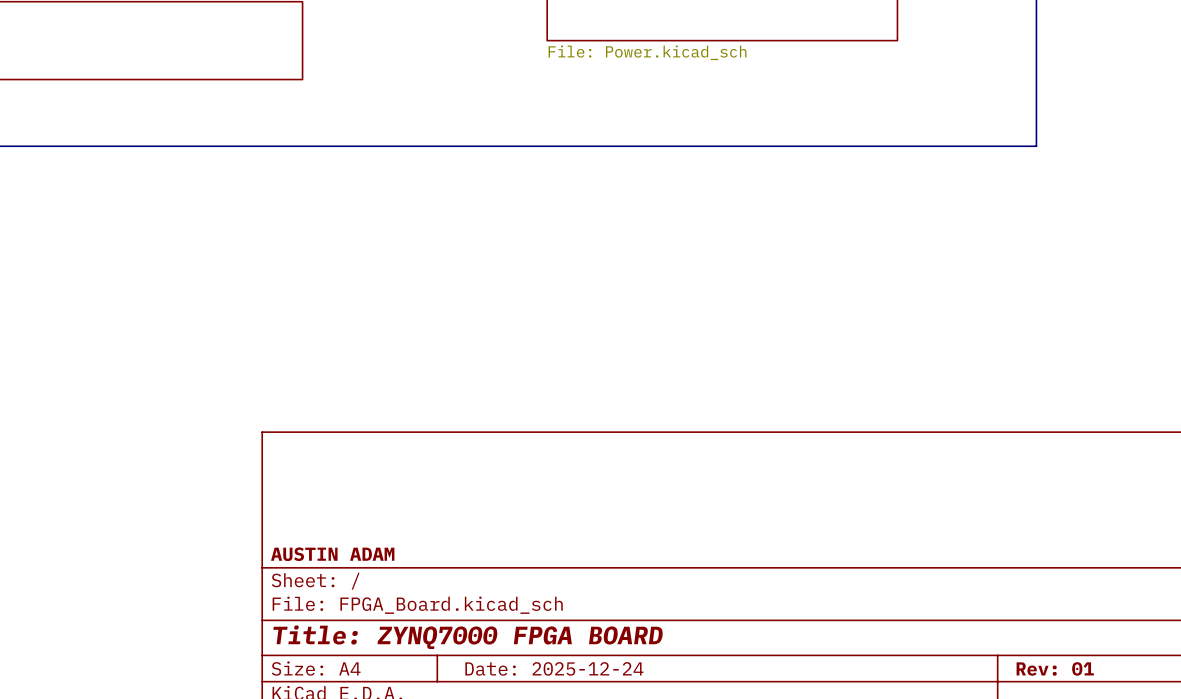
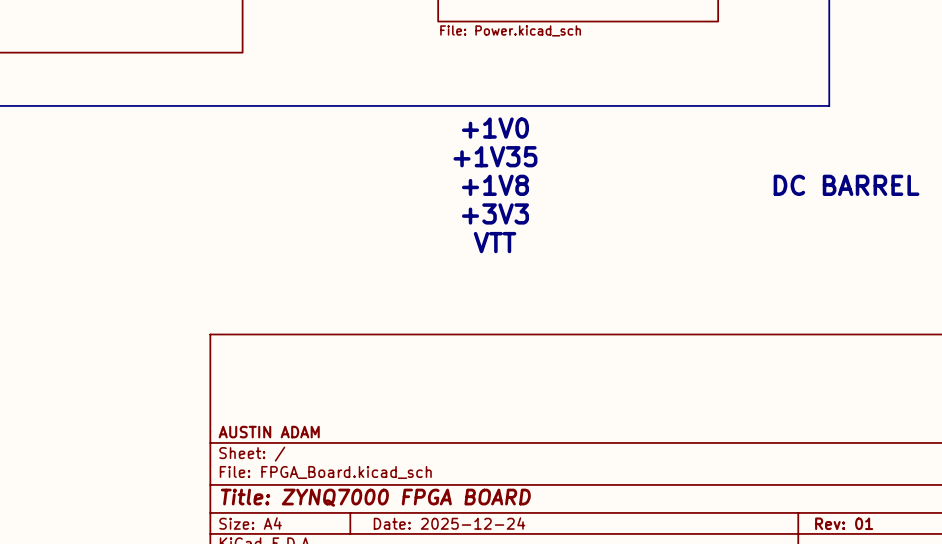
text: none -> +1V0 (495, 128)
text: none -> +1V35 (495, 156)
text: none -> +1V8 (495, 185)
text: none -> DC BARREL (846, 185)
text: none -> +3V3 (495, 213)
text: none -> VTT (495, 242)

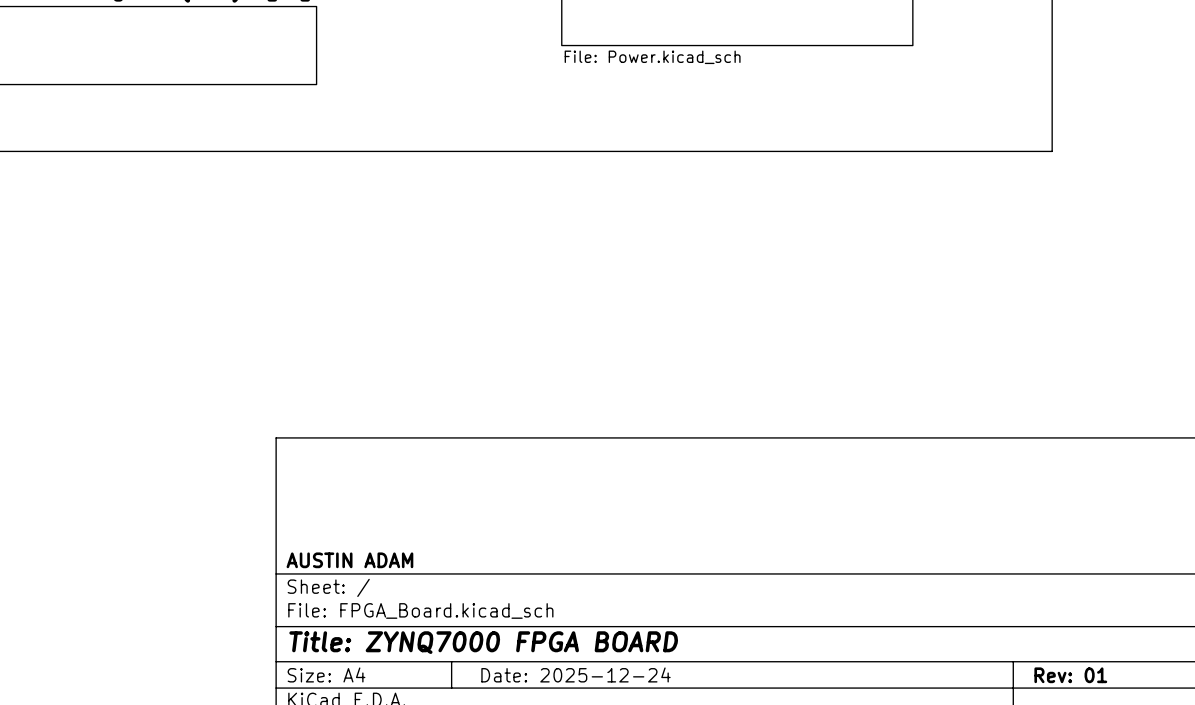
text: +1V0 (495, 128) -> none
text: +1V35 (495, 156) -> none
text: +1V8 (495, 185) -> none
text: DC BARREL (846, 185) -> none
text: +3V3 (495, 213) -> none
text: VTT (495, 242) -> none

